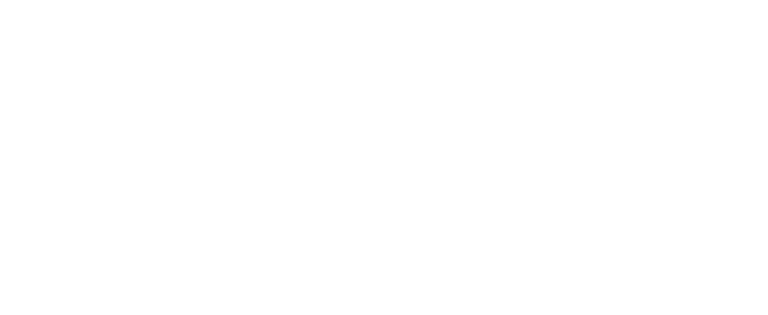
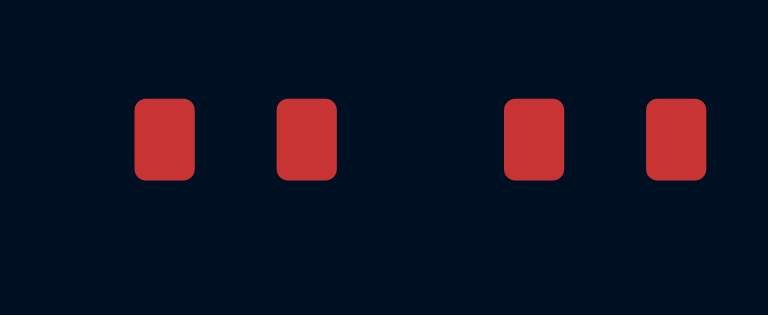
part: none -> (235, 139)
part: none -> (605, 139)

